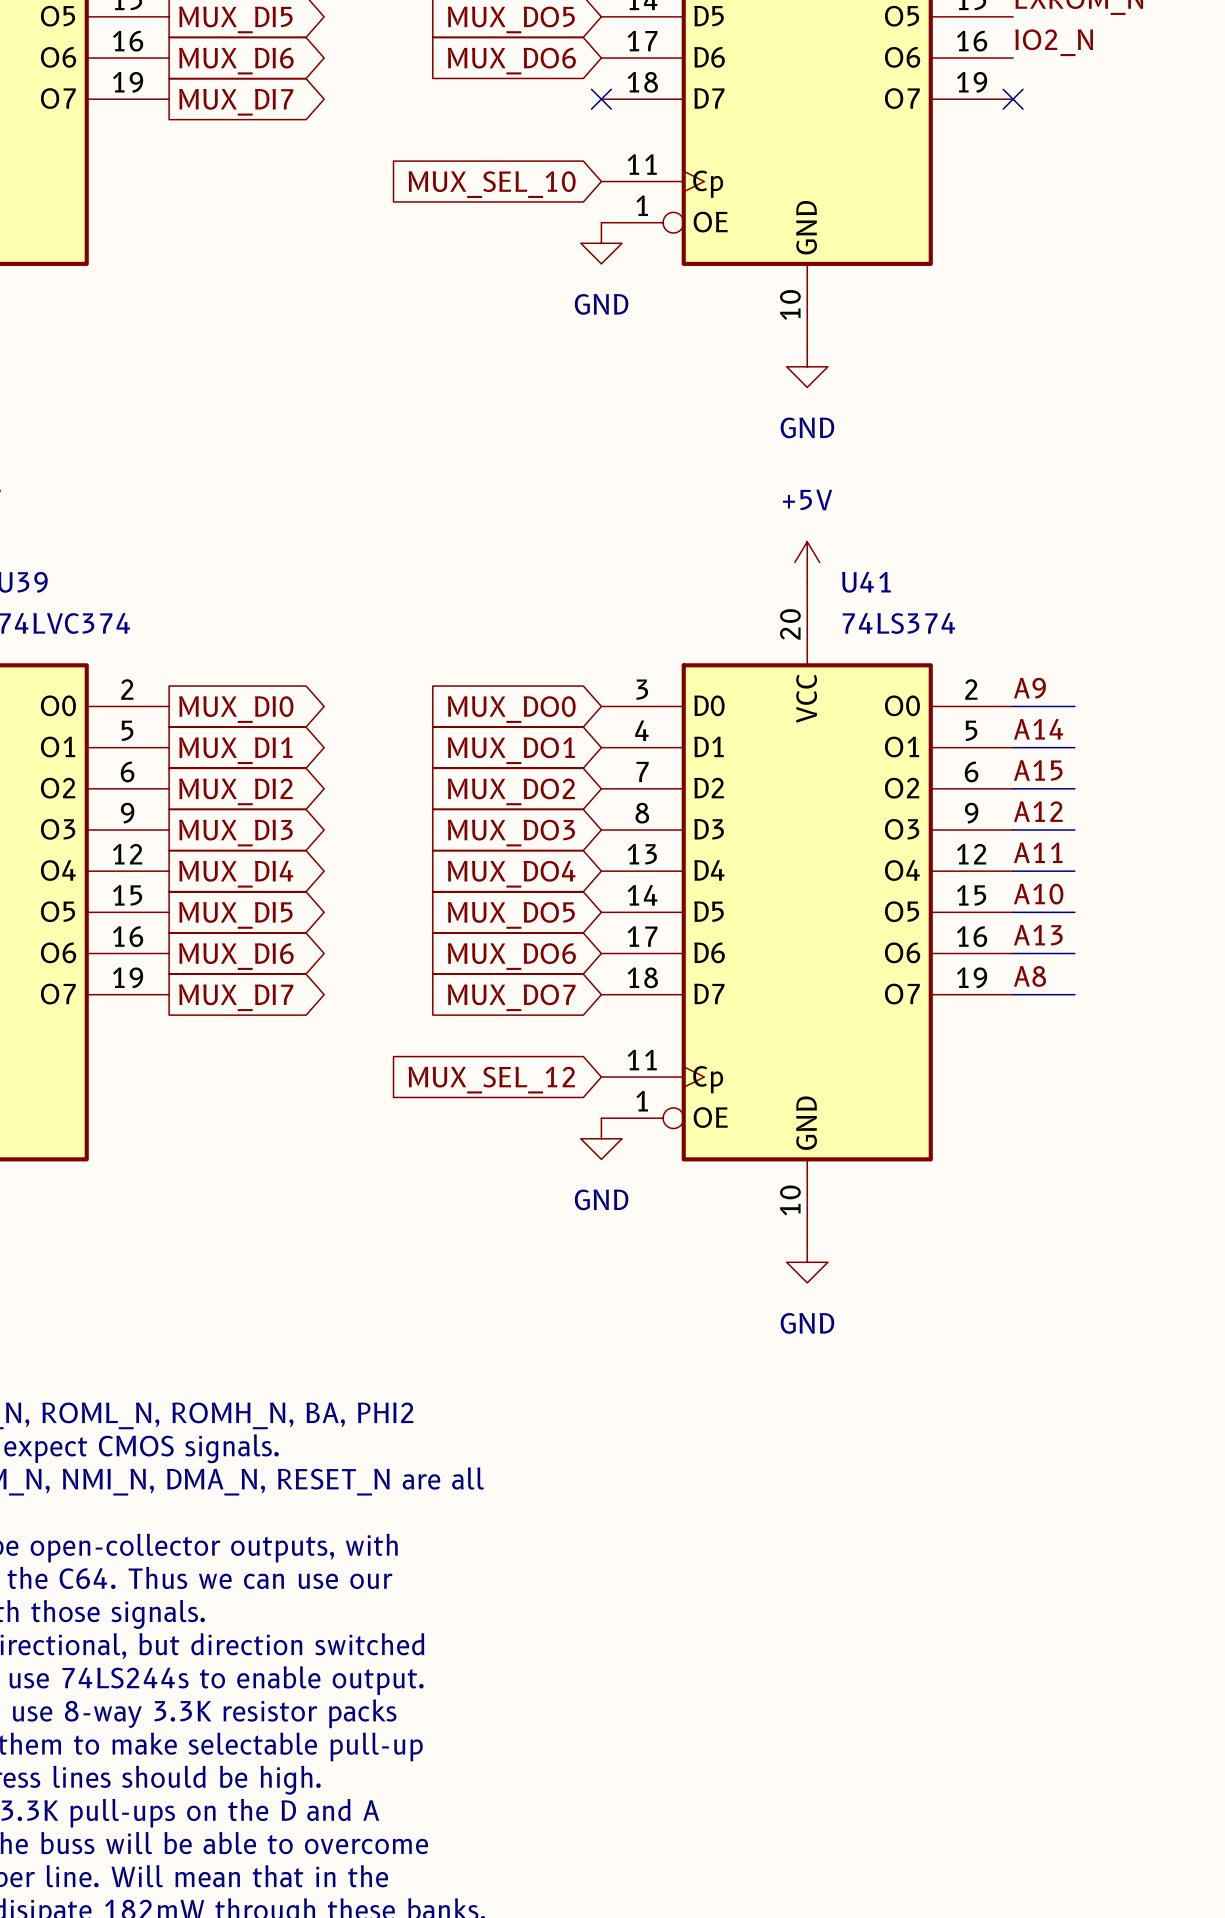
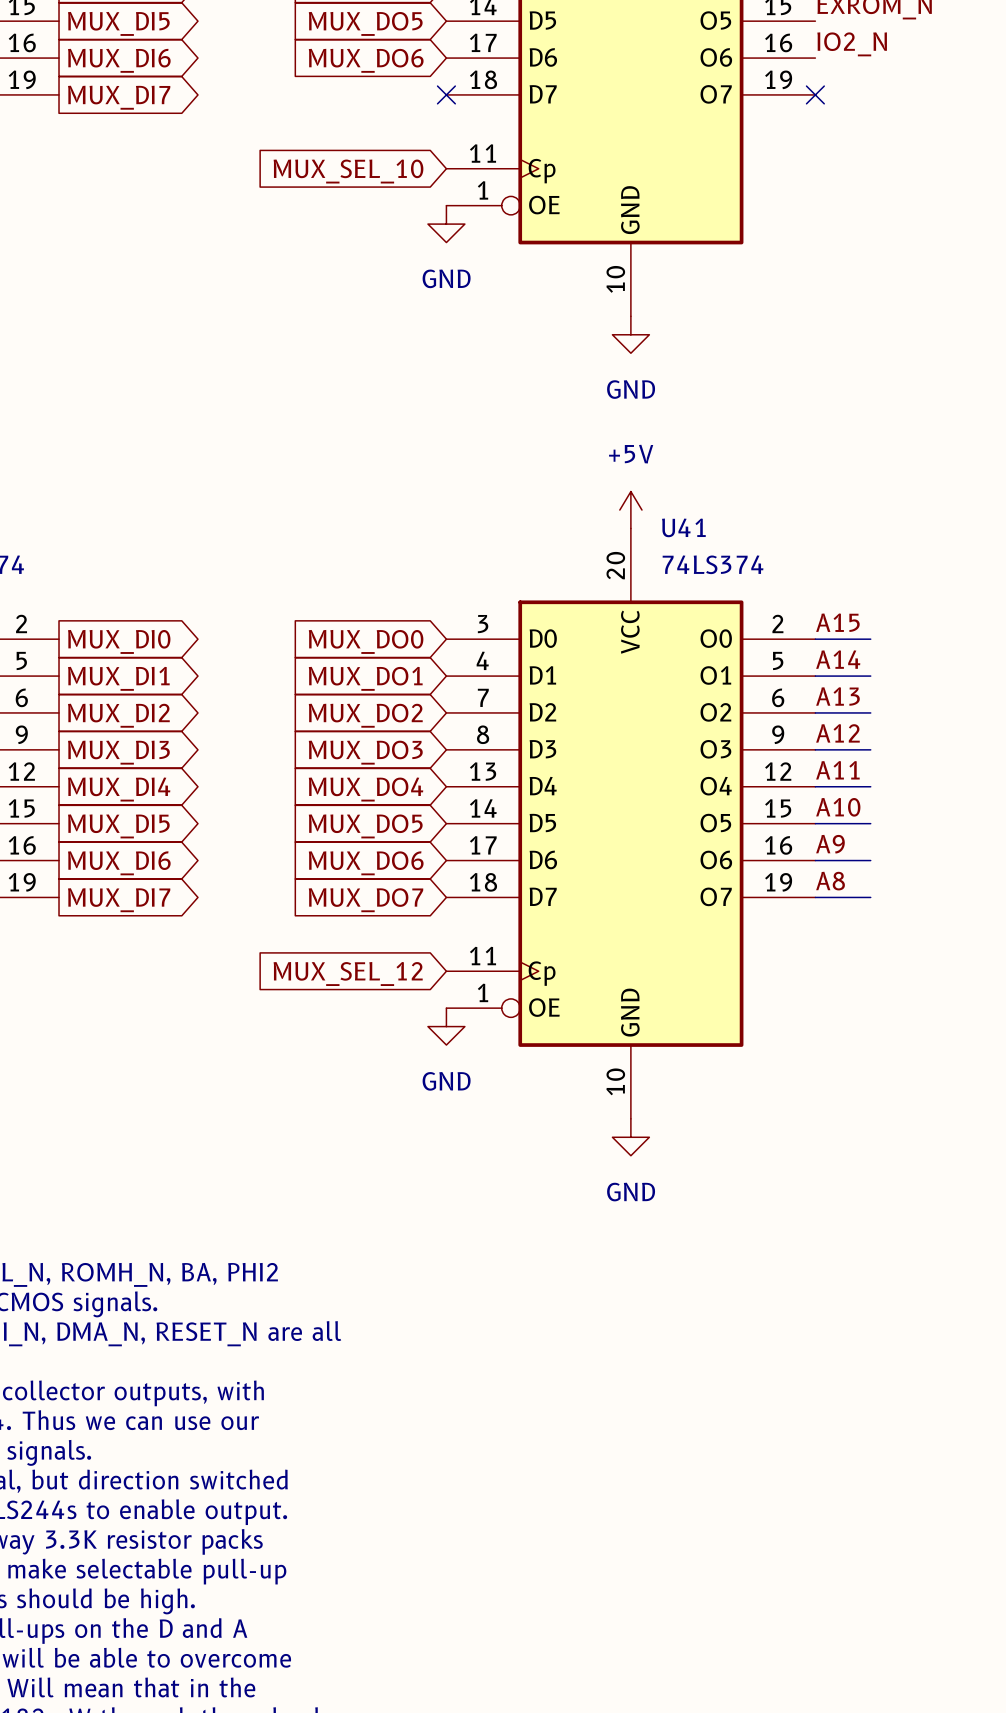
label: A9 (1029, 688) -> A15 (837, 622)
label: A15 (1038, 770) -> A13 (837, 696)
label: A13 (1038, 935) -> A9 (830, 844)

